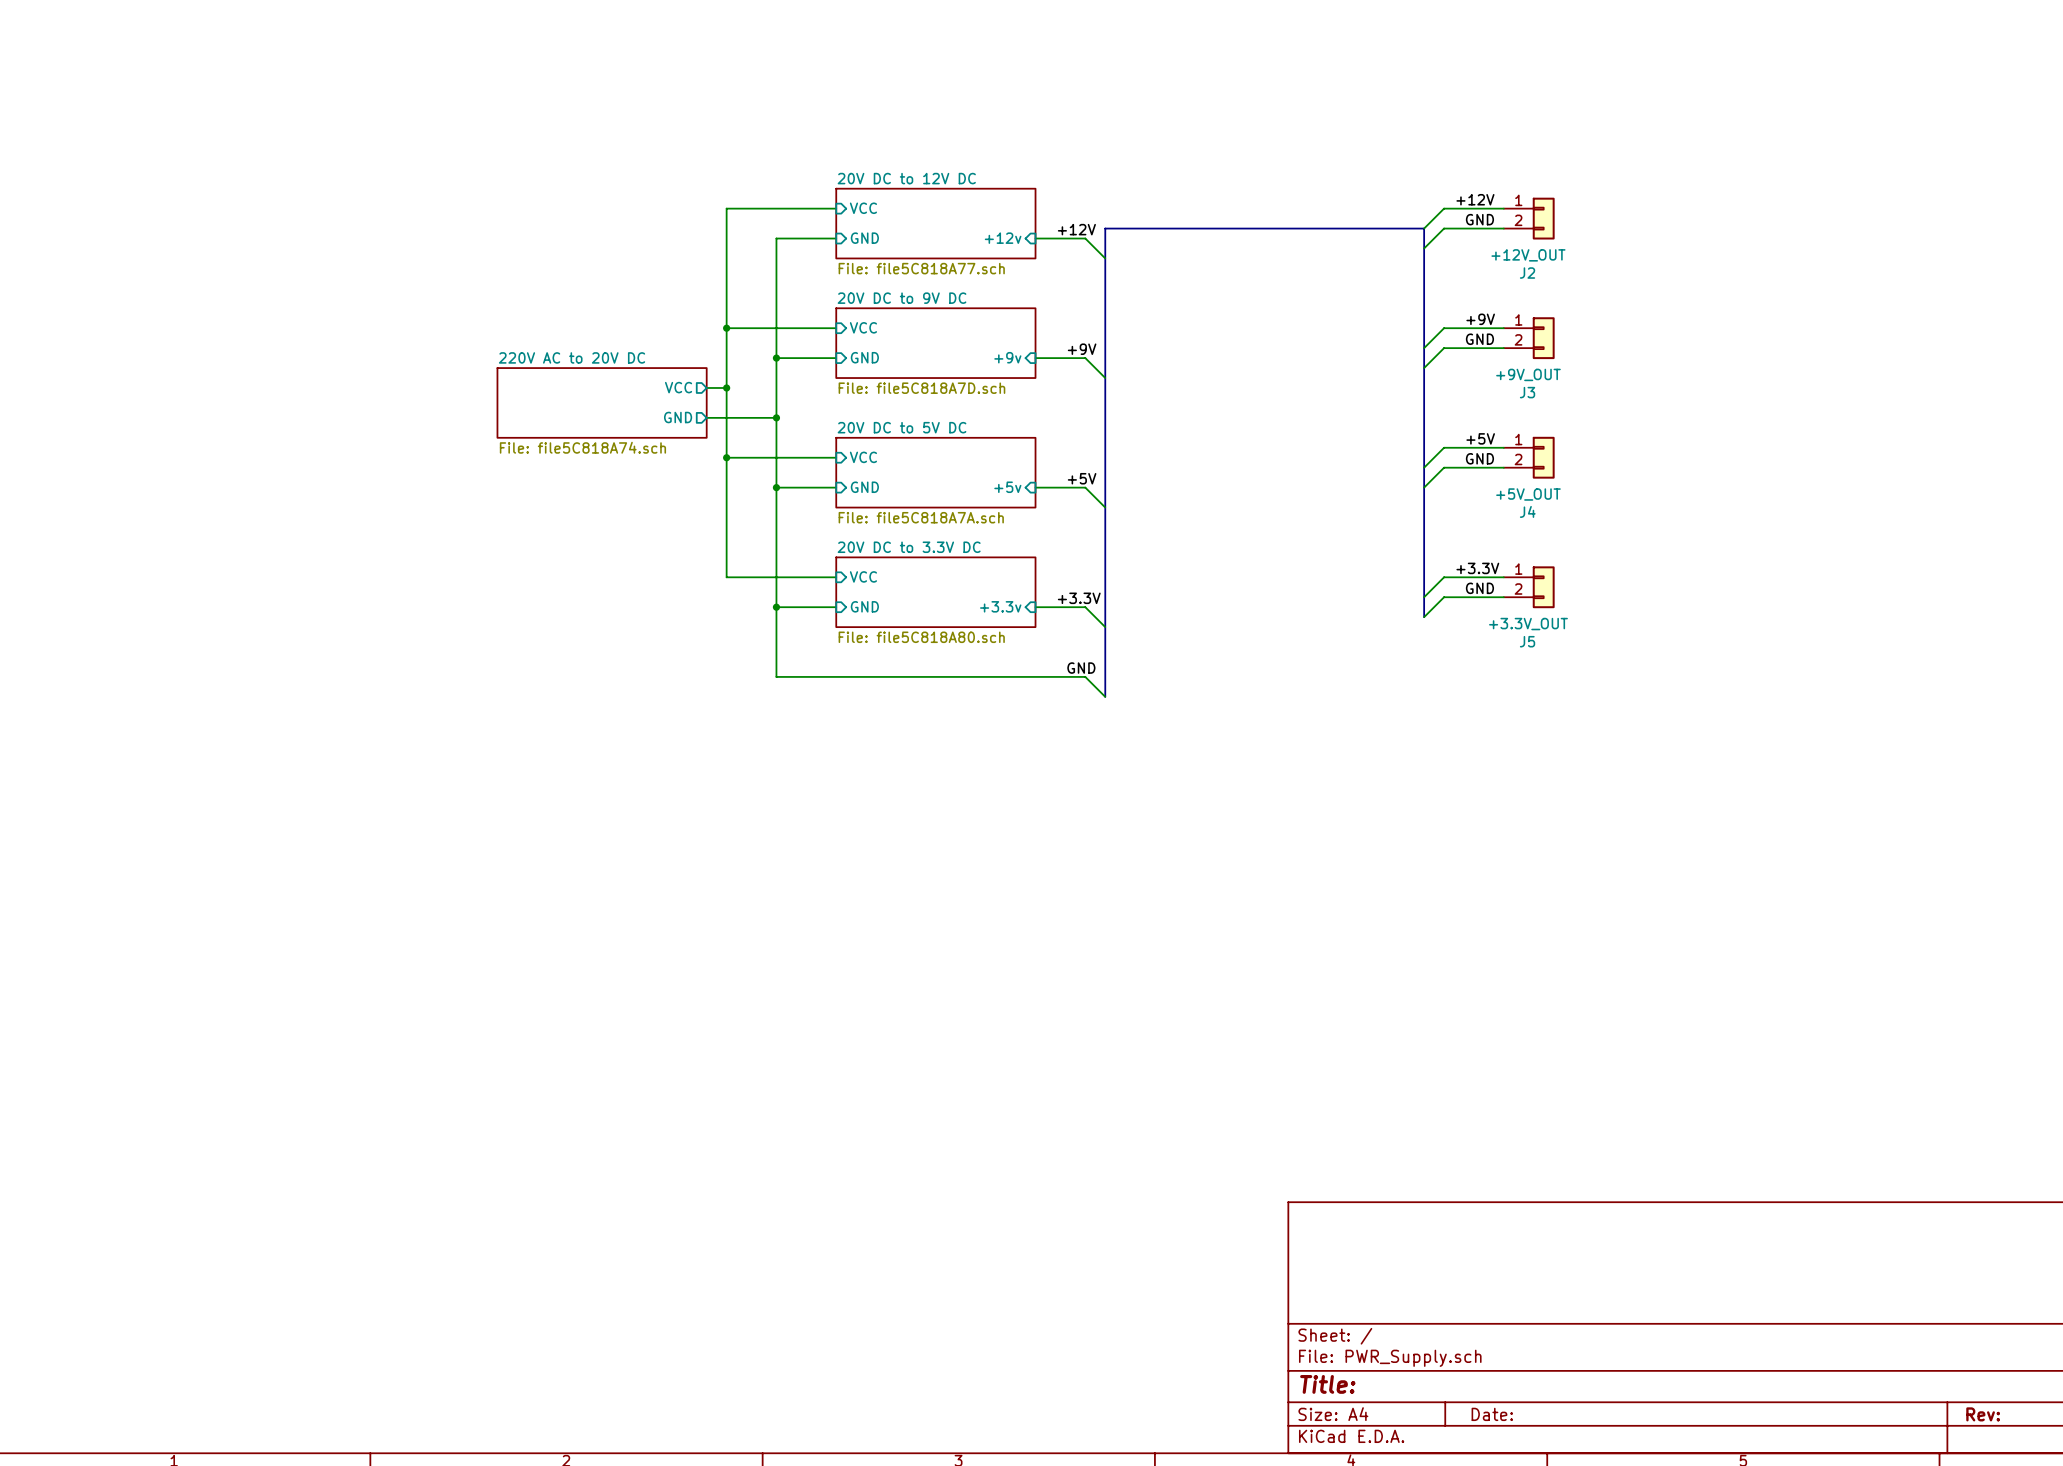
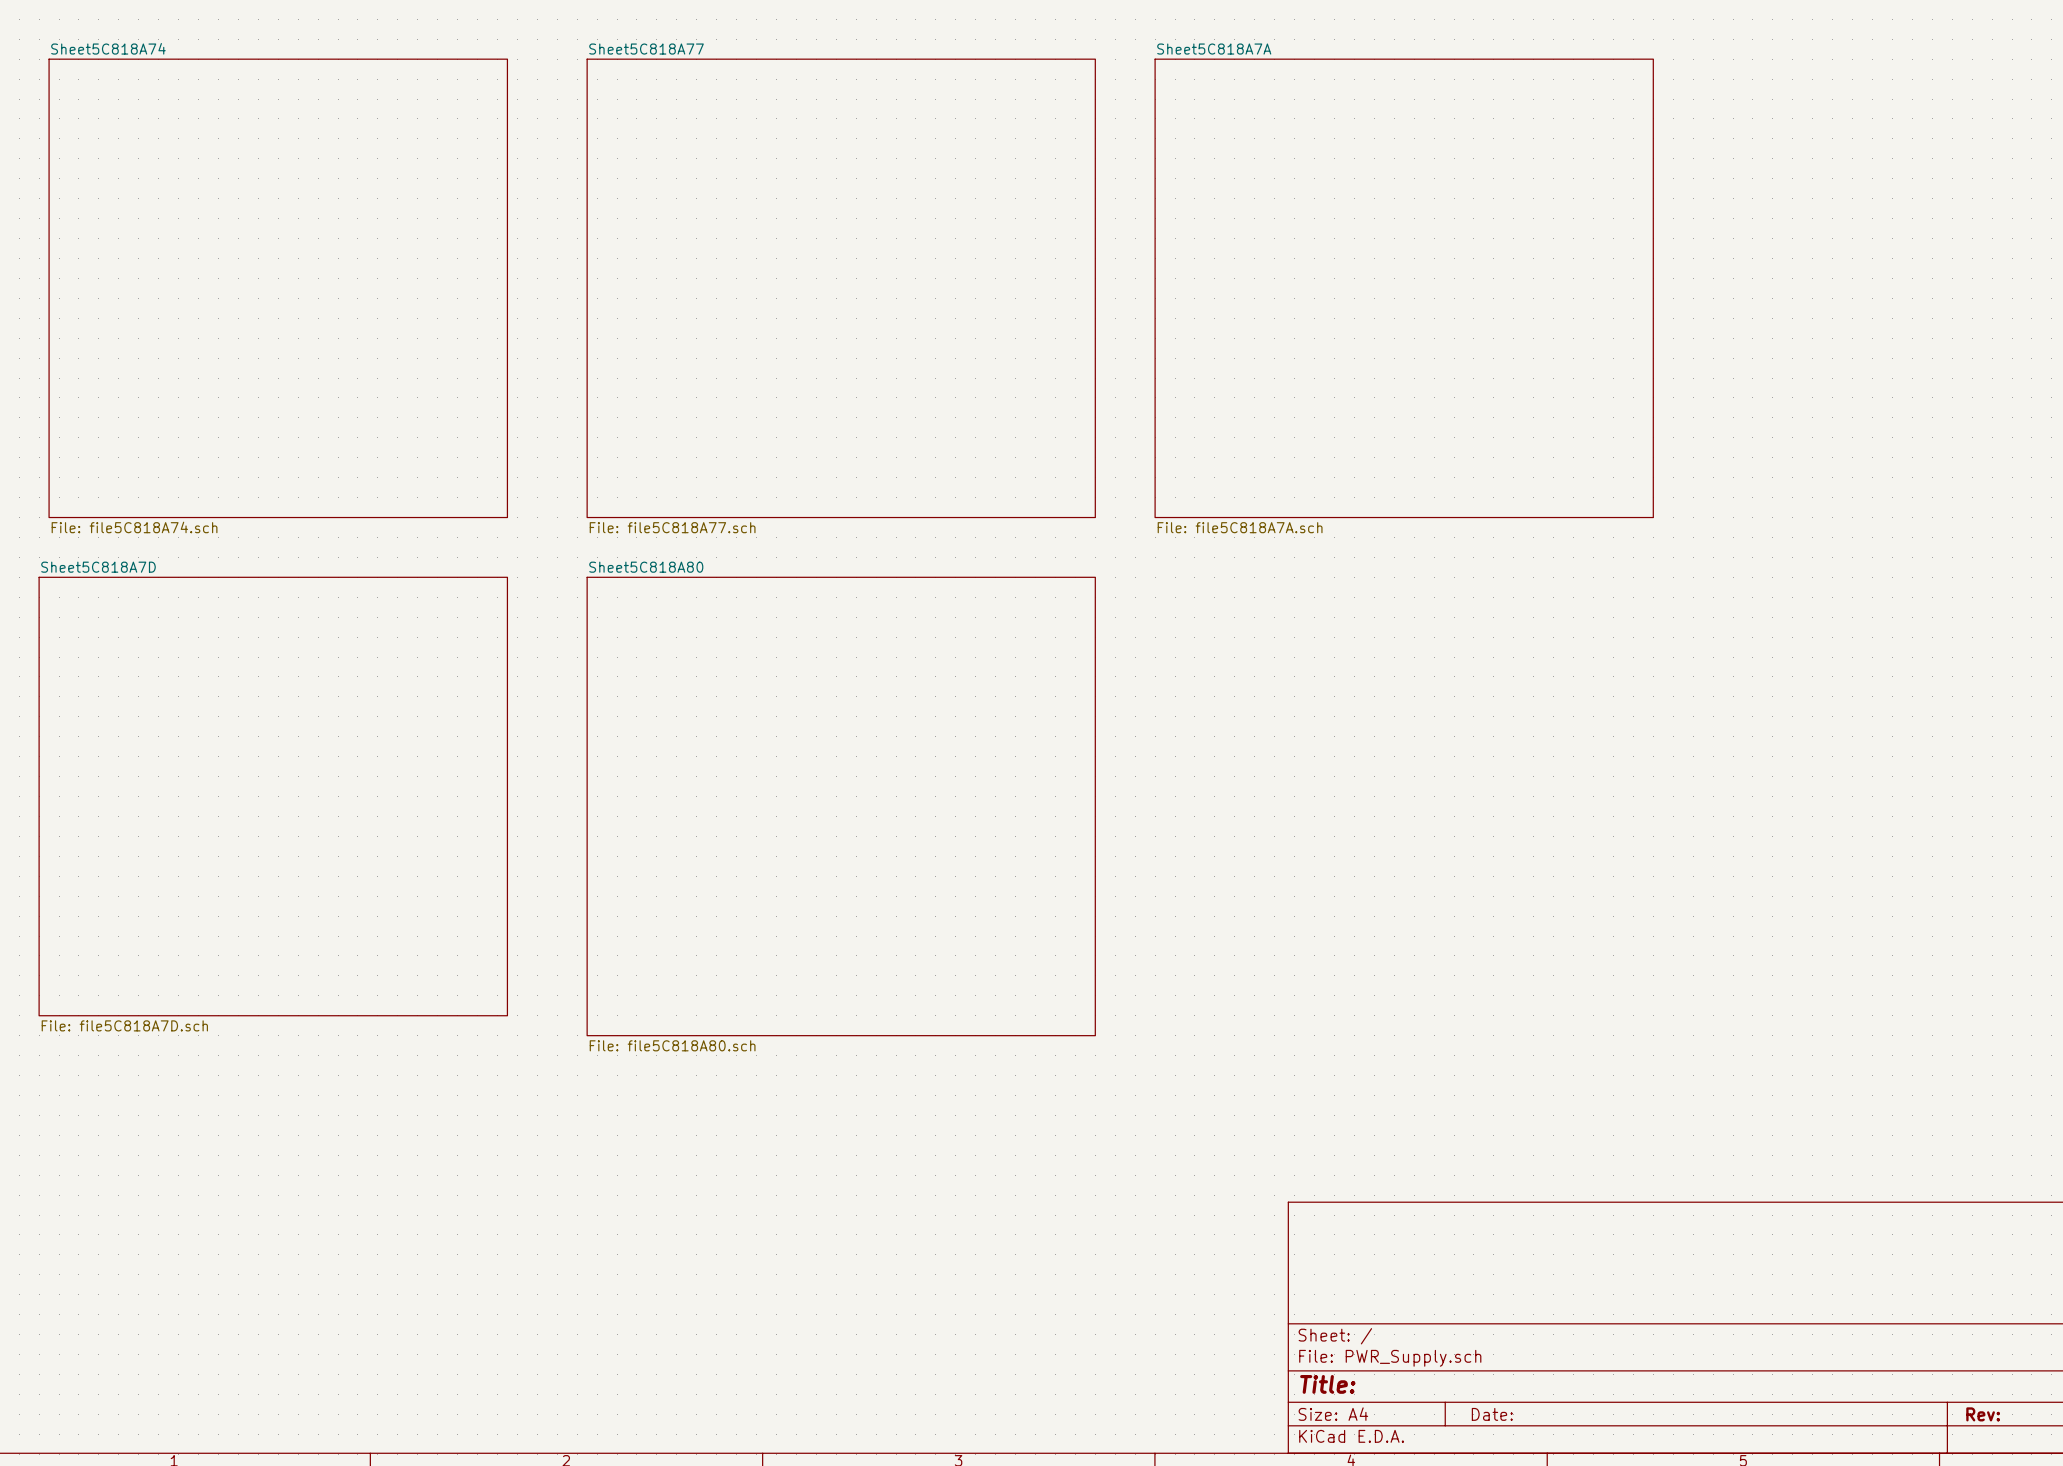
label: +12V (1475, 199) -> none
wire: (836, 208) (726, 208) (726, 577) (836, 577) -> none
sheet pin: VCC (863, 208) -> none
wire: (1503, 208) (1444, 208) (1424, 228) -> none
J2: +12V_OUT (1529, 218) -> none
label: GND (1479, 219) -> none
sheet 20V DC to 12V DC: File: file5C818A77.sch (935, 223) -> none
wire: (1503, 228) (1444, 228) (1424, 248) -> none
label: +12V (1076, 229) -> none
wire: (836, 238) (776, 238) (776, 676) (1085, 676) (1105, 696) -> none
sheet pin: GND (864, 238) -> none
sheet pin: +12v (1003, 238) -> none
wire: (1035, 238) (1085, 238) (1105, 258) -> none
sheet Sheet5C818A74: none -> File: file5C818A74.sch (278, 288)
sheet Sheet5C818A77: none -> File: file5C818A77.sch (841, 288)
sheet Sheet5C818A7A: none -> File: file5C818A7A.sch (1404, 288)
label: +9V (1480, 319) -> none
sheet pin: VCC (863, 327) -> none
wire: (726, 328) (836, 328) -> none
junction: (726, 328) -> none
wire: (1503, 328) (1444, 328) (1424, 348) -> none
J3: +9V_OUT (1529, 338) -> none
label: GND (1479, 339) -> none
sheet 20V DC to 9V DC: File: file5C818A7D.sch (935, 343) -> none
wire: (1503, 348) (1444, 348) (1424, 368) -> none
label: +9V (1082, 349) -> none
sheet pin: GND (864, 357) -> none
sheet pin: +9v (1007, 357) -> none
wire: (776, 358) (836, 358) -> none
junction: (776, 358) -> none
wire: (1035, 358) (1085, 358) (1105, 378) -> none
sheet pin: VCC (678, 387) -> none
wire: (706, 387) (726, 387) -> none
junction: (726, 387) -> none
sheet 220V AC to 20V DC: File: file5C818A74.sch (602, 402) -> none
sheet pin: GND (678, 417) -> none
wire: (706, 417) (776, 417) -> none
junction: (776, 417) -> none
label: +5V (1480, 438) -> none
wire: (1503, 447) (1444, 447) (1424, 467) -> none
wire: (726, 457) (836, 457) -> none
junction: (726, 457) -> none
sheet pin: VCC (863, 457) -> none
J4: +5V_OUT (1529, 457) -> none
label: GND (1479, 458) -> none
wire: (1503, 467) (1444, 467) (1424, 487) -> none
sheet 20V DC to 5V DC: File: file5C818A7A.sch (935, 472) -> none
label: +5V (1082, 478) -> none
wire: (776, 487) (836, 487) -> none
junction: (776, 487) -> none
sheet pin: GND (864, 487) -> none
sheet pin: +5v (1007, 487) -> none
wire: (1035, 487) (1085, 487) (1105, 507) -> none
label: +3.3V (1477, 568) -> none
sheet pin: VCC (863, 576) -> none
wire: (1503, 577) (1444, 577) (1424, 597) -> none
J5: +3.3V_OUT (1529, 587) -> none
label: GND (1479, 588) -> none
sheet 20V DC to 3.3V DC: File: file5C818A80.sch (935, 592) -> none
wire: (1503, 597) (1444, 597) (1424, 617) -> none
label: +3.3V (1079, 598) -> none
sheet pin: GND (864, 606) -> none
sheet pin: +3.3v (1000, 606) -> none
wire: (776, 607) (836, 607) -> none
junction: (776, 607) -> none
wire: (1035, 607) (1085, 607) (1105, 627) -> none
bus: (1424, 617) (1424, 228) (1105, 228) (1105, 696) -> none
label: GND (1081, 668) -> none
sheet Sheet5C818A7D: none -> File: file5C818A7D.sch (273, 796)
sheet Sheet5C818A80: none -> File: file5C818A80.sch (841, 806)

